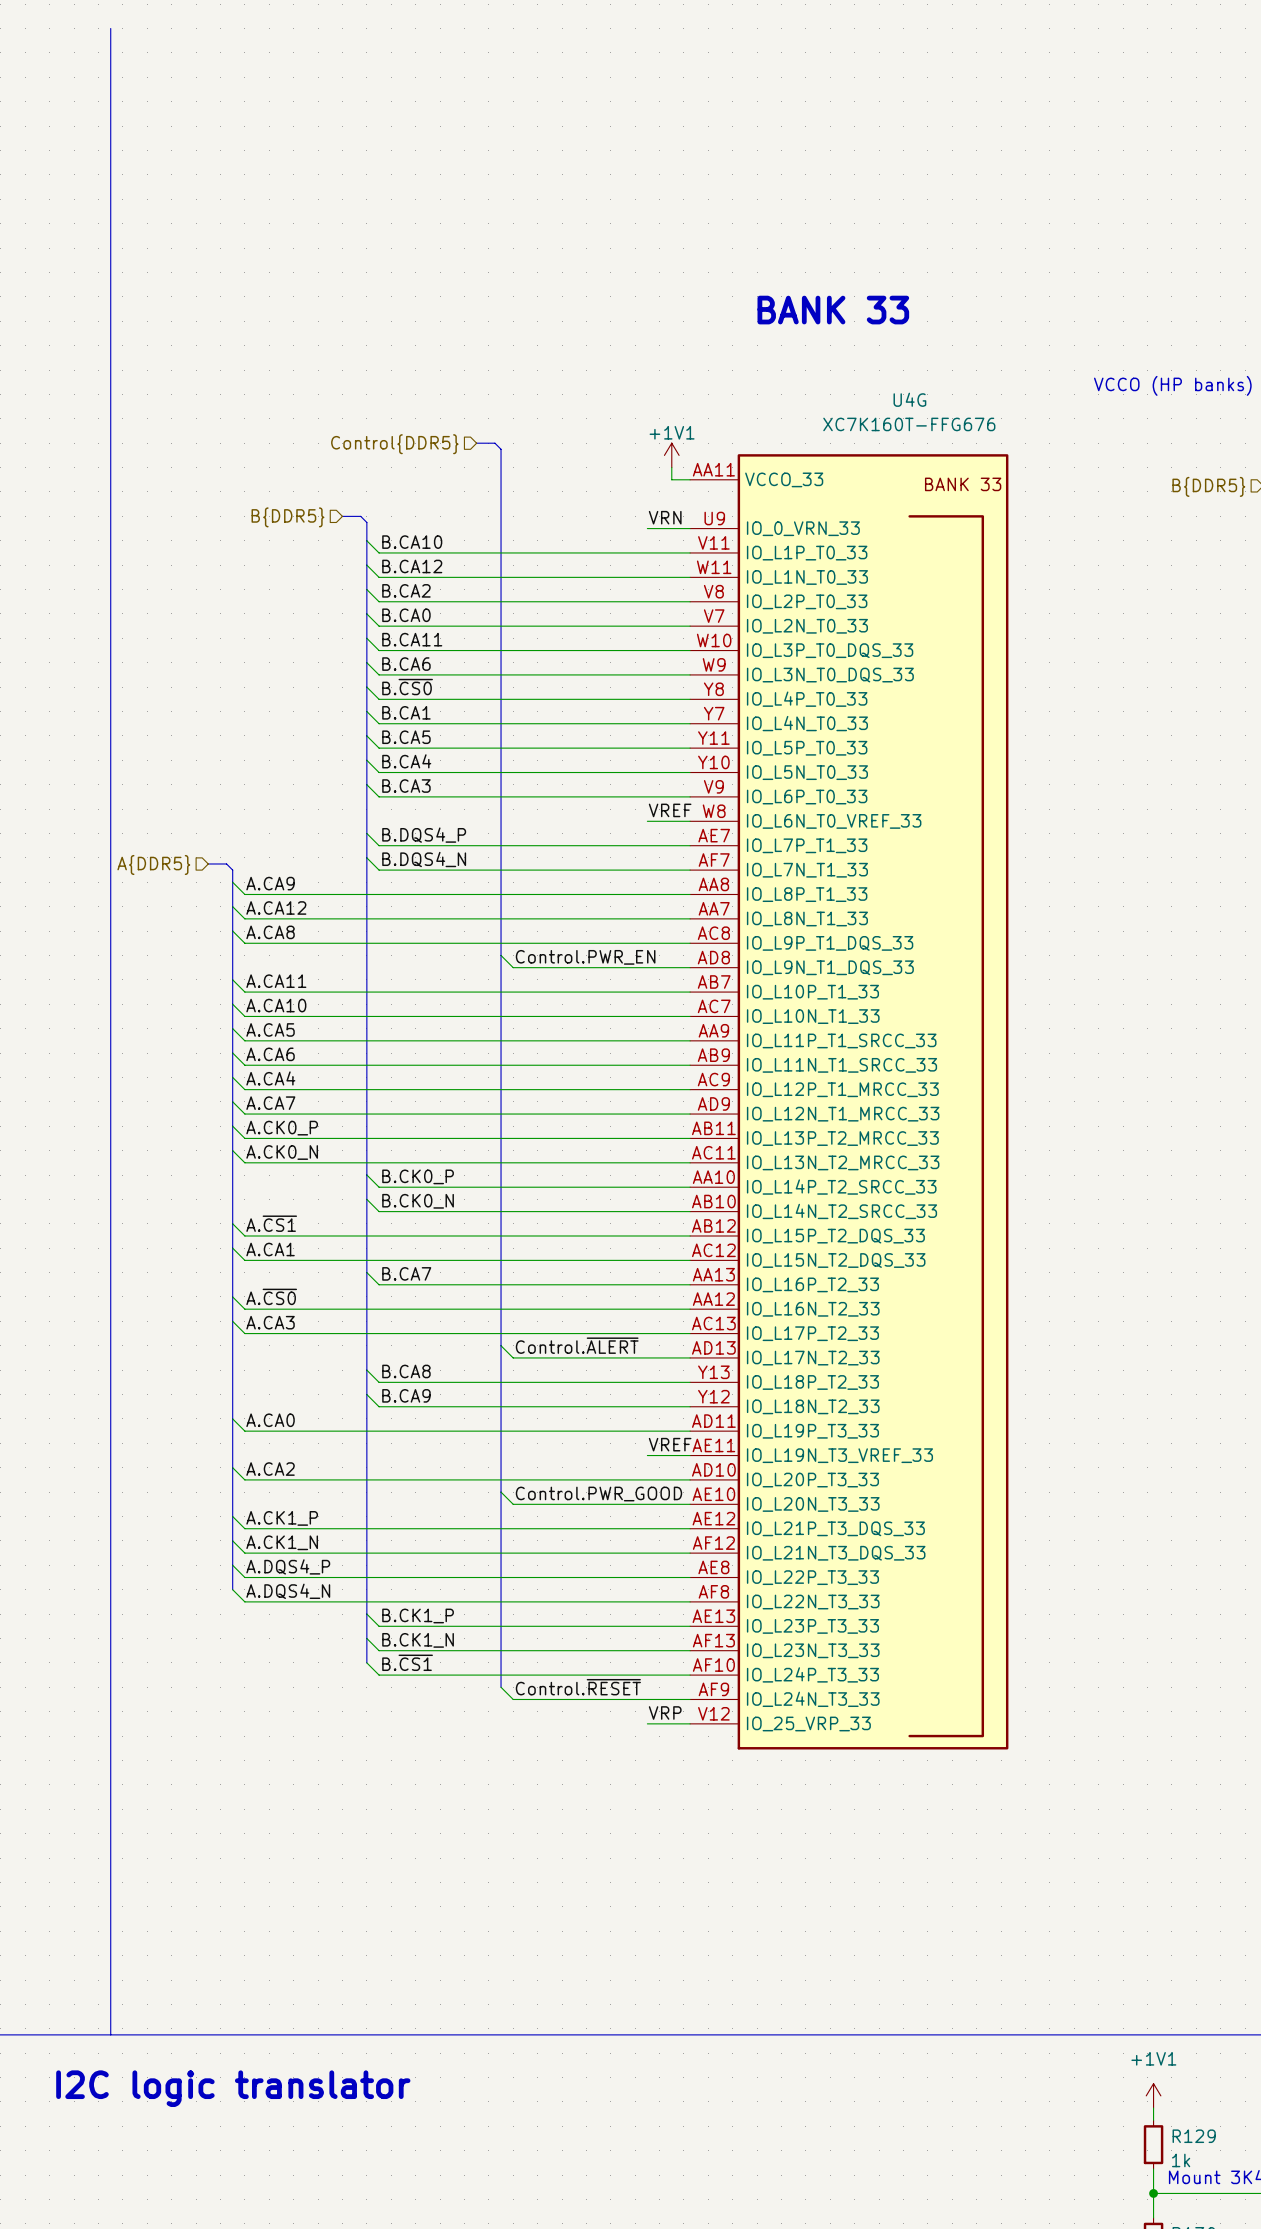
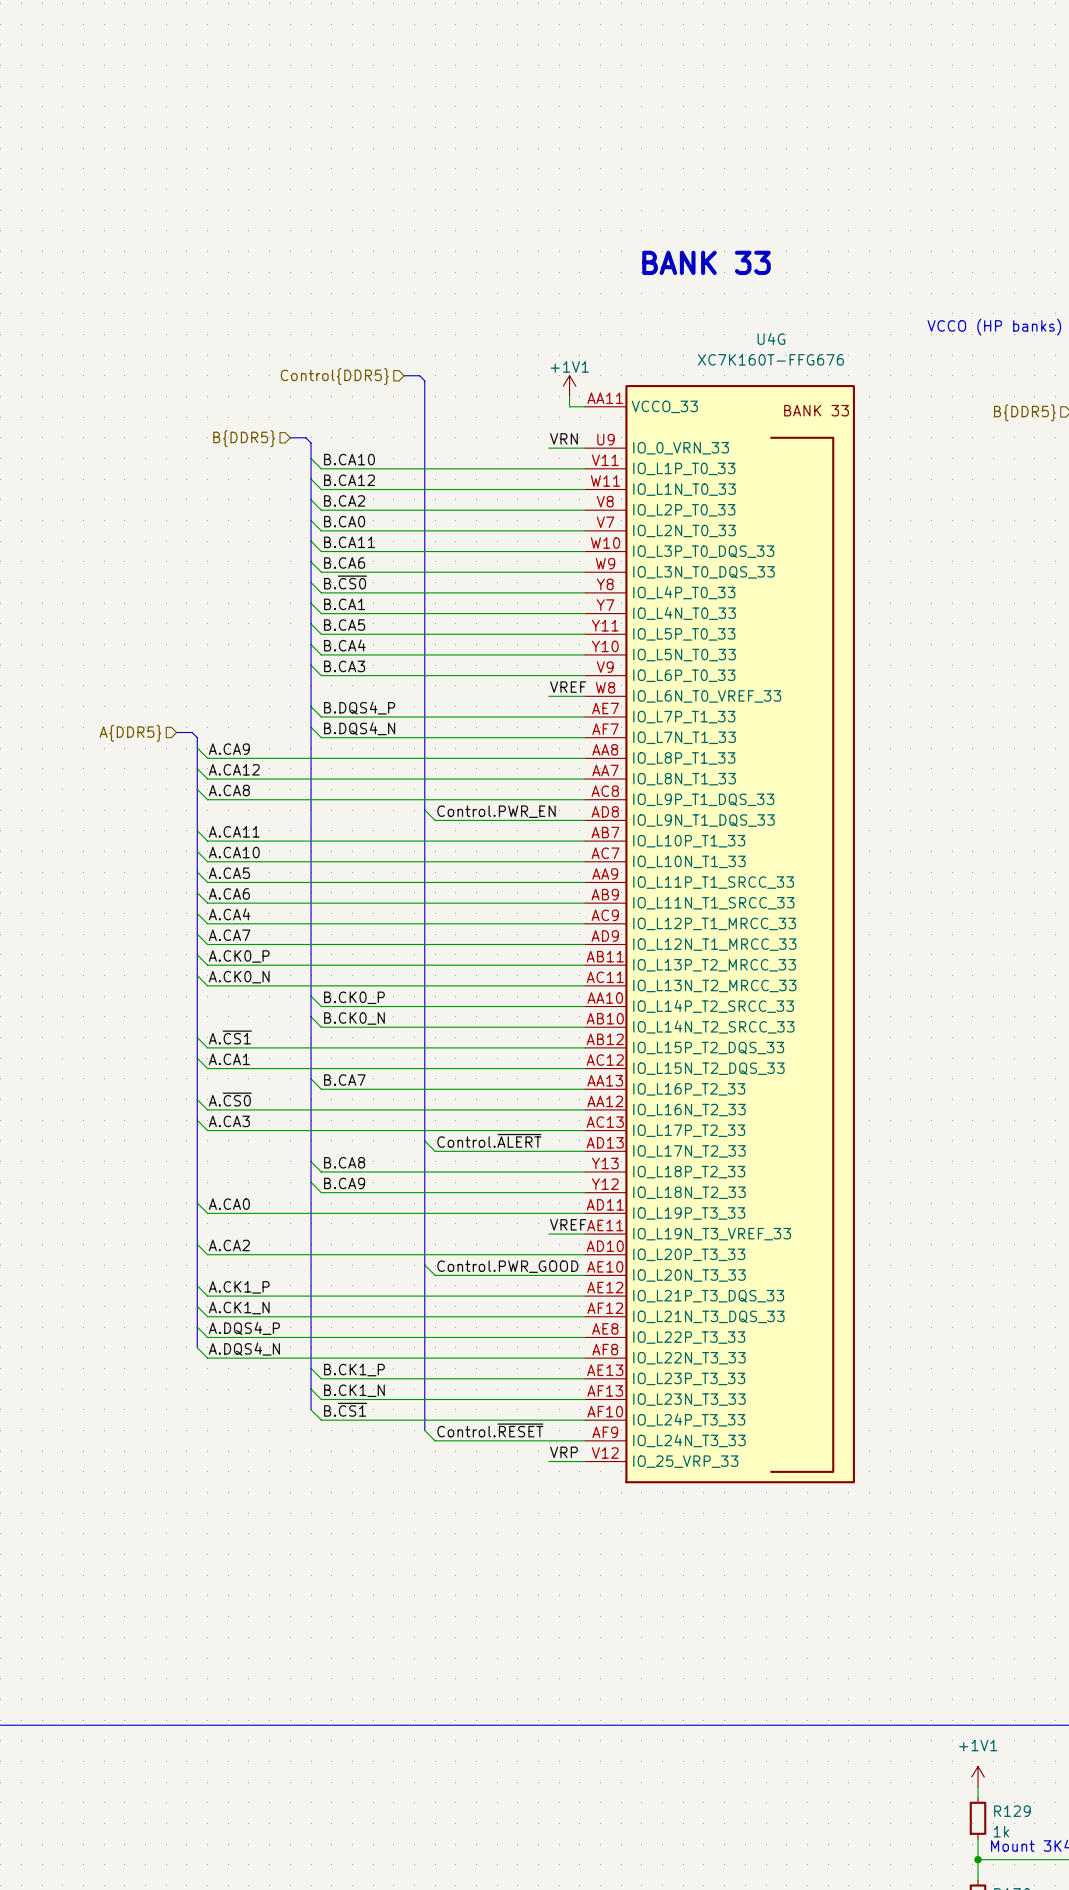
line: (110, 28) (110, 2034) -> none
text: I2C logic translator (233, 2088) -> none

